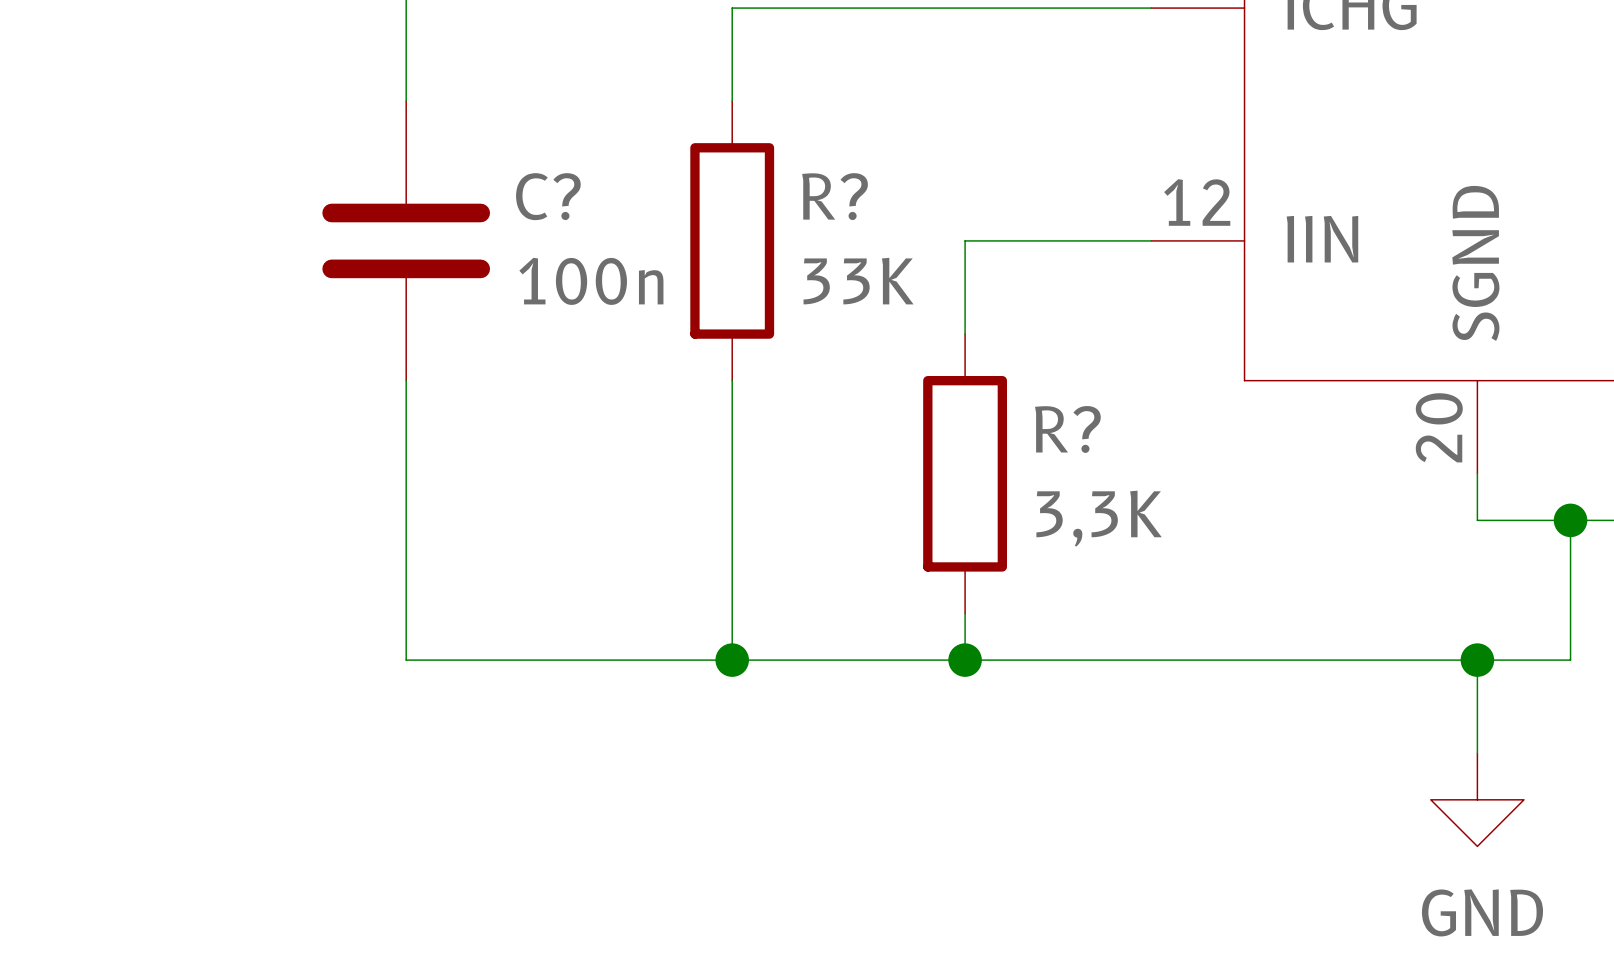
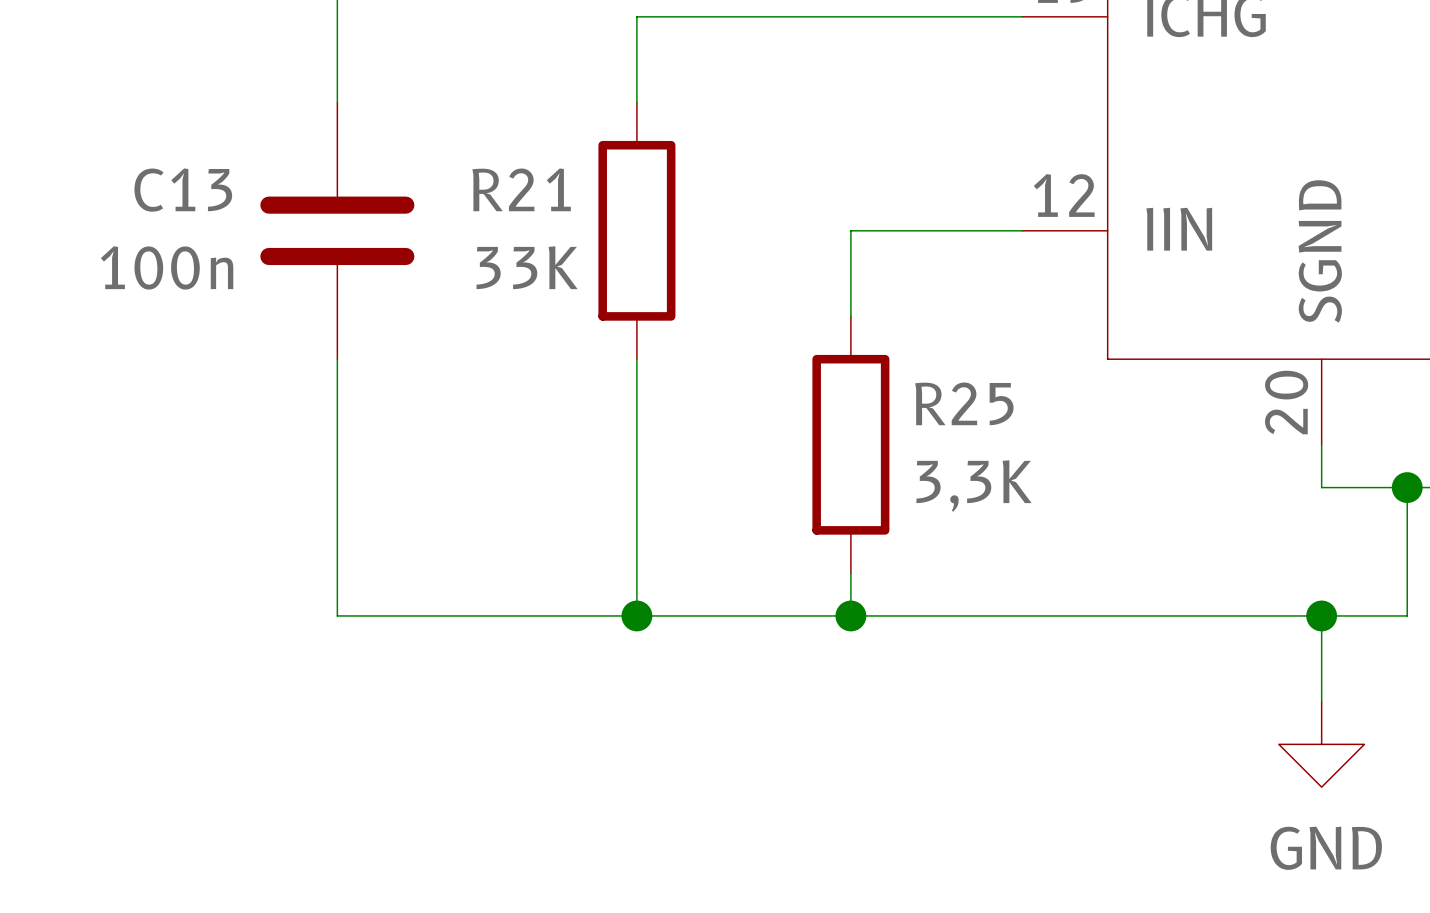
C? name: C? (548, 196) -> C13 (183, 190)
R? name: R? (835, 196) -> R21 (521, 189)
C? value position: 100n (591, 281) -> 100n (167, 267)
R? value position: 33K (858, 281) -> 33K (527, 267)
R? name: R? (1067, 429) -> R25 (964, 403)

